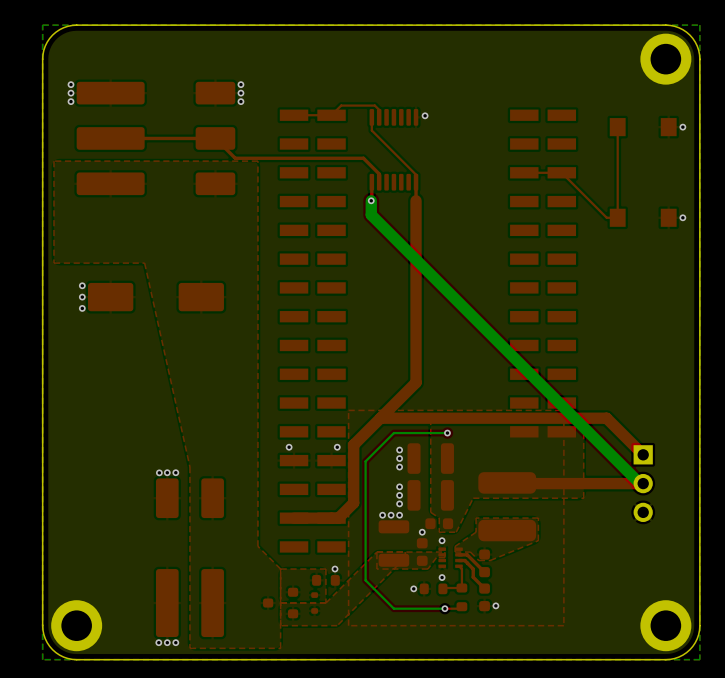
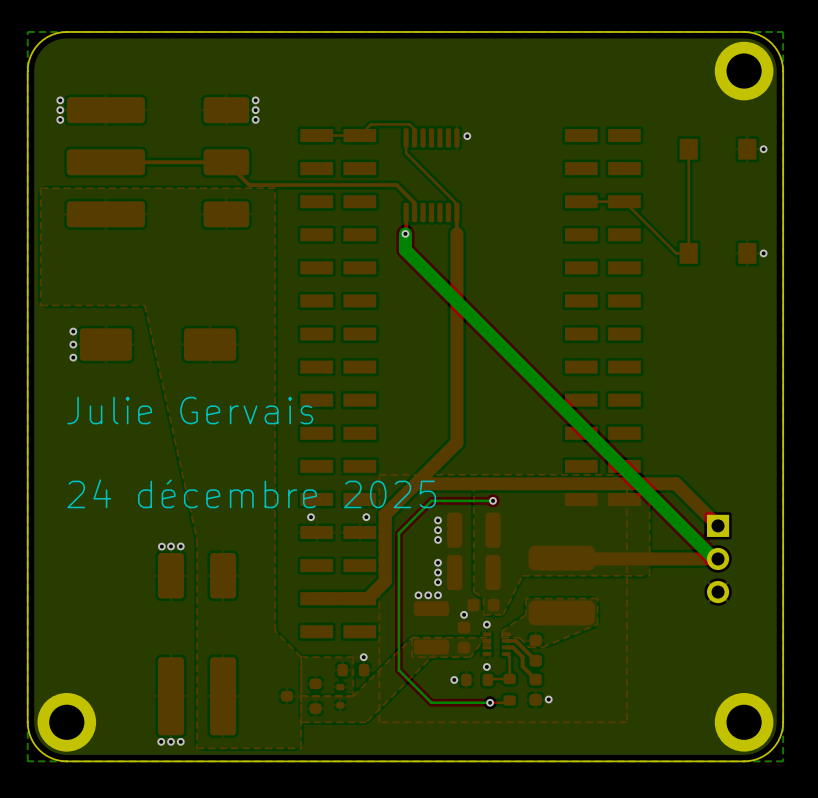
text: none -> Julie Gervais (190, 410)
text: none -> 24 décembre 2025 (251, 493)

